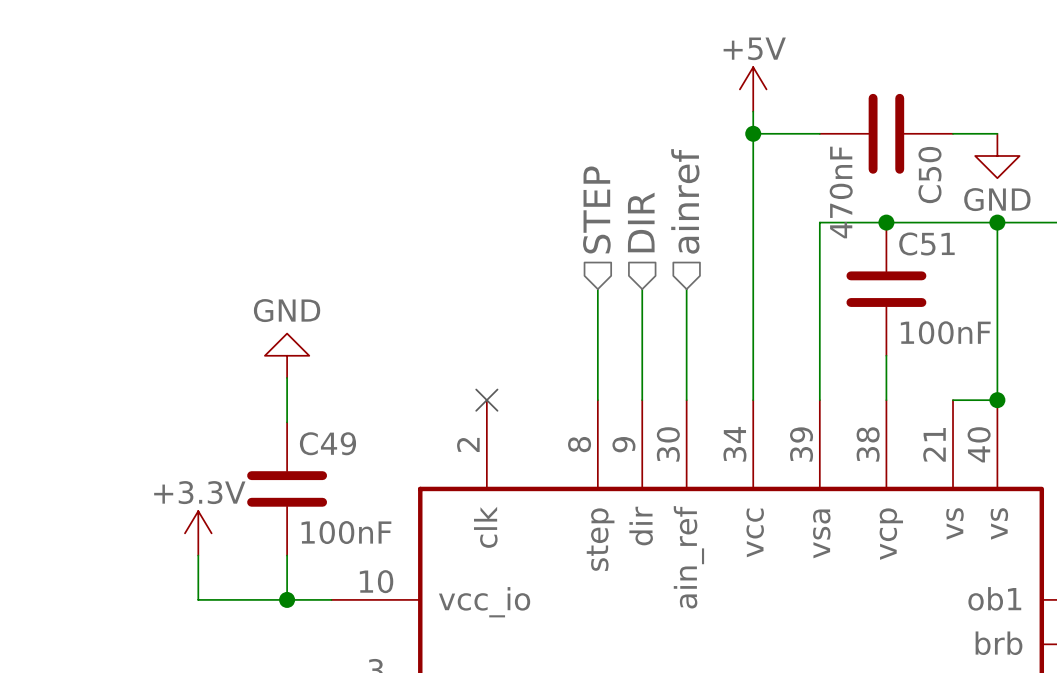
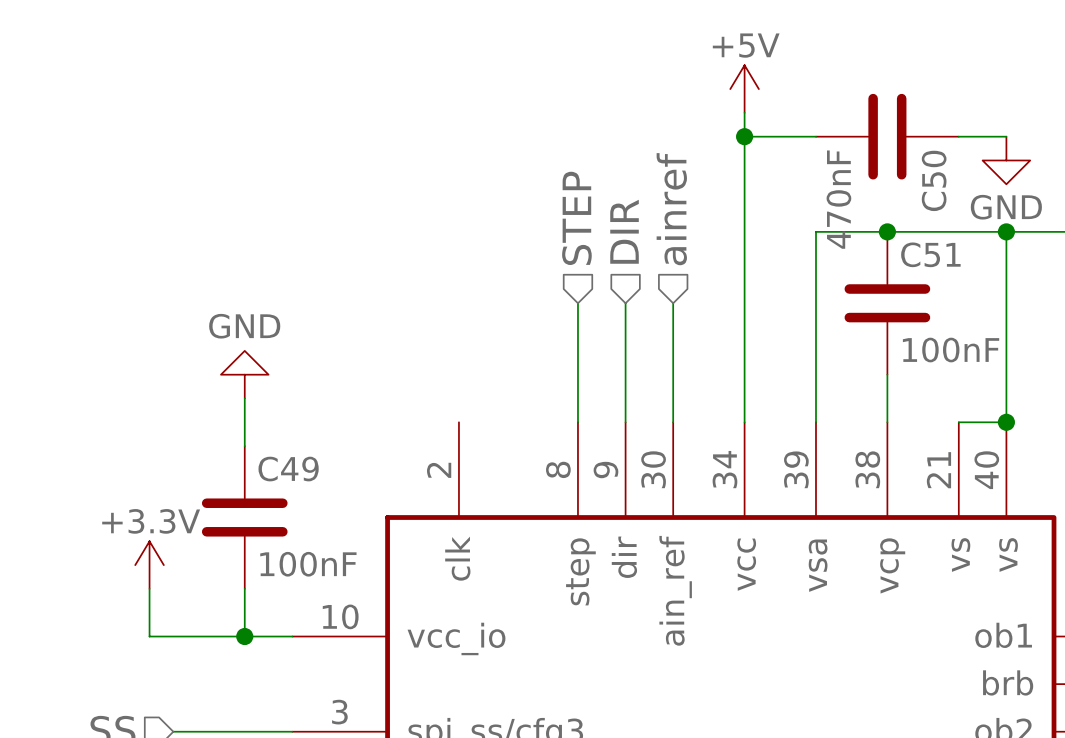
no-connect mark: (486, 400) -> none

